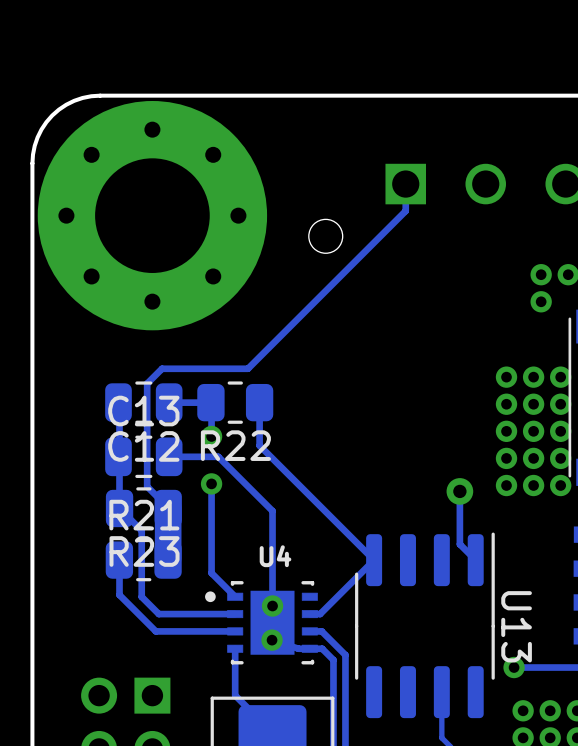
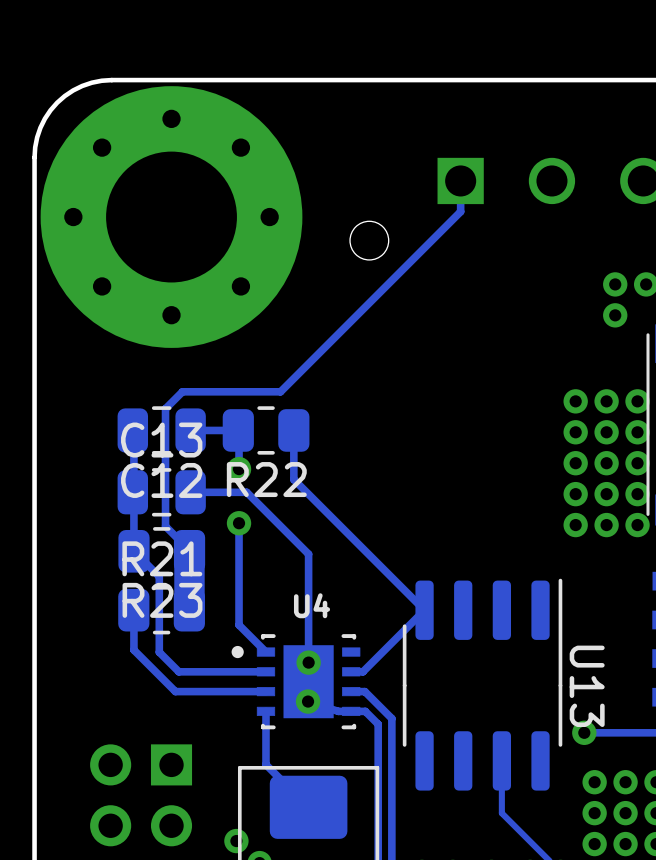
track: (459, 491) (459, 544) (475, 560) -> none
part: (459, 491) -> none

